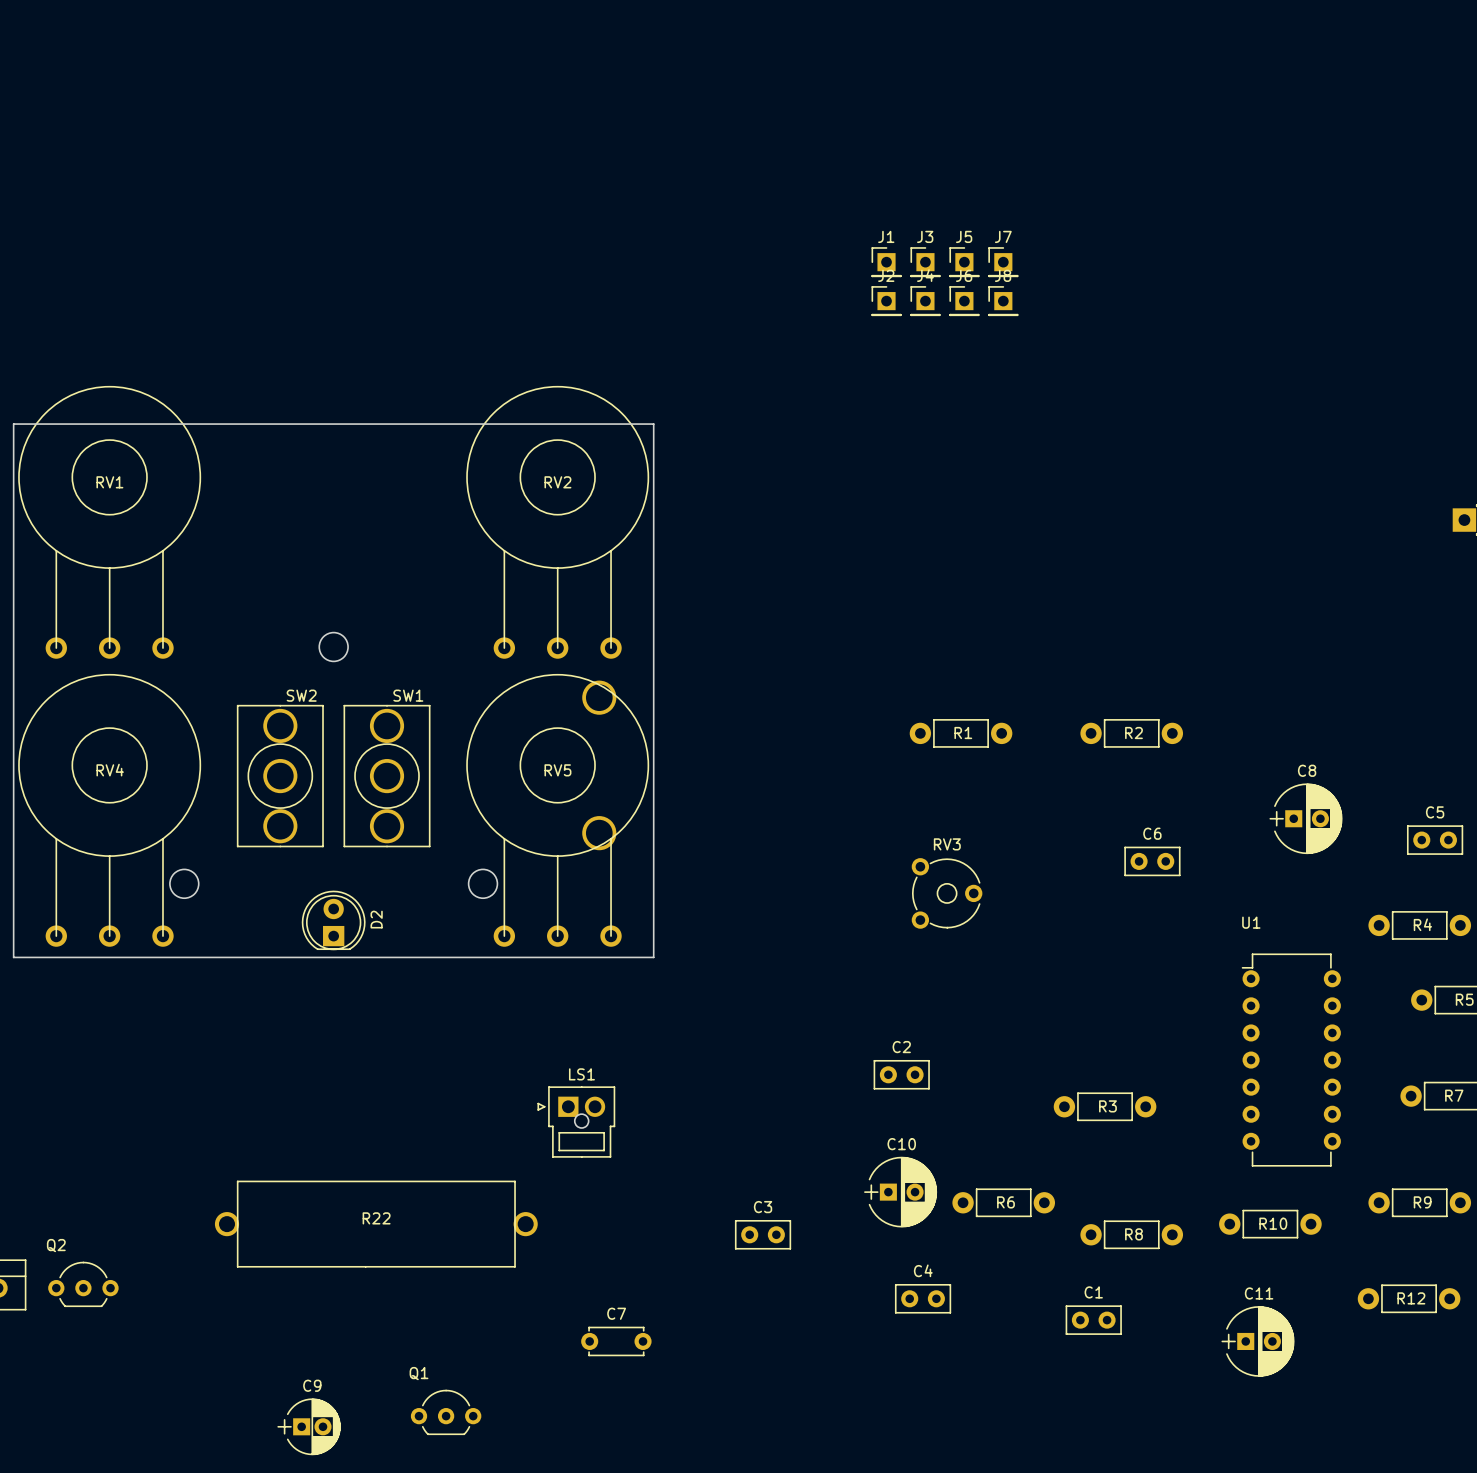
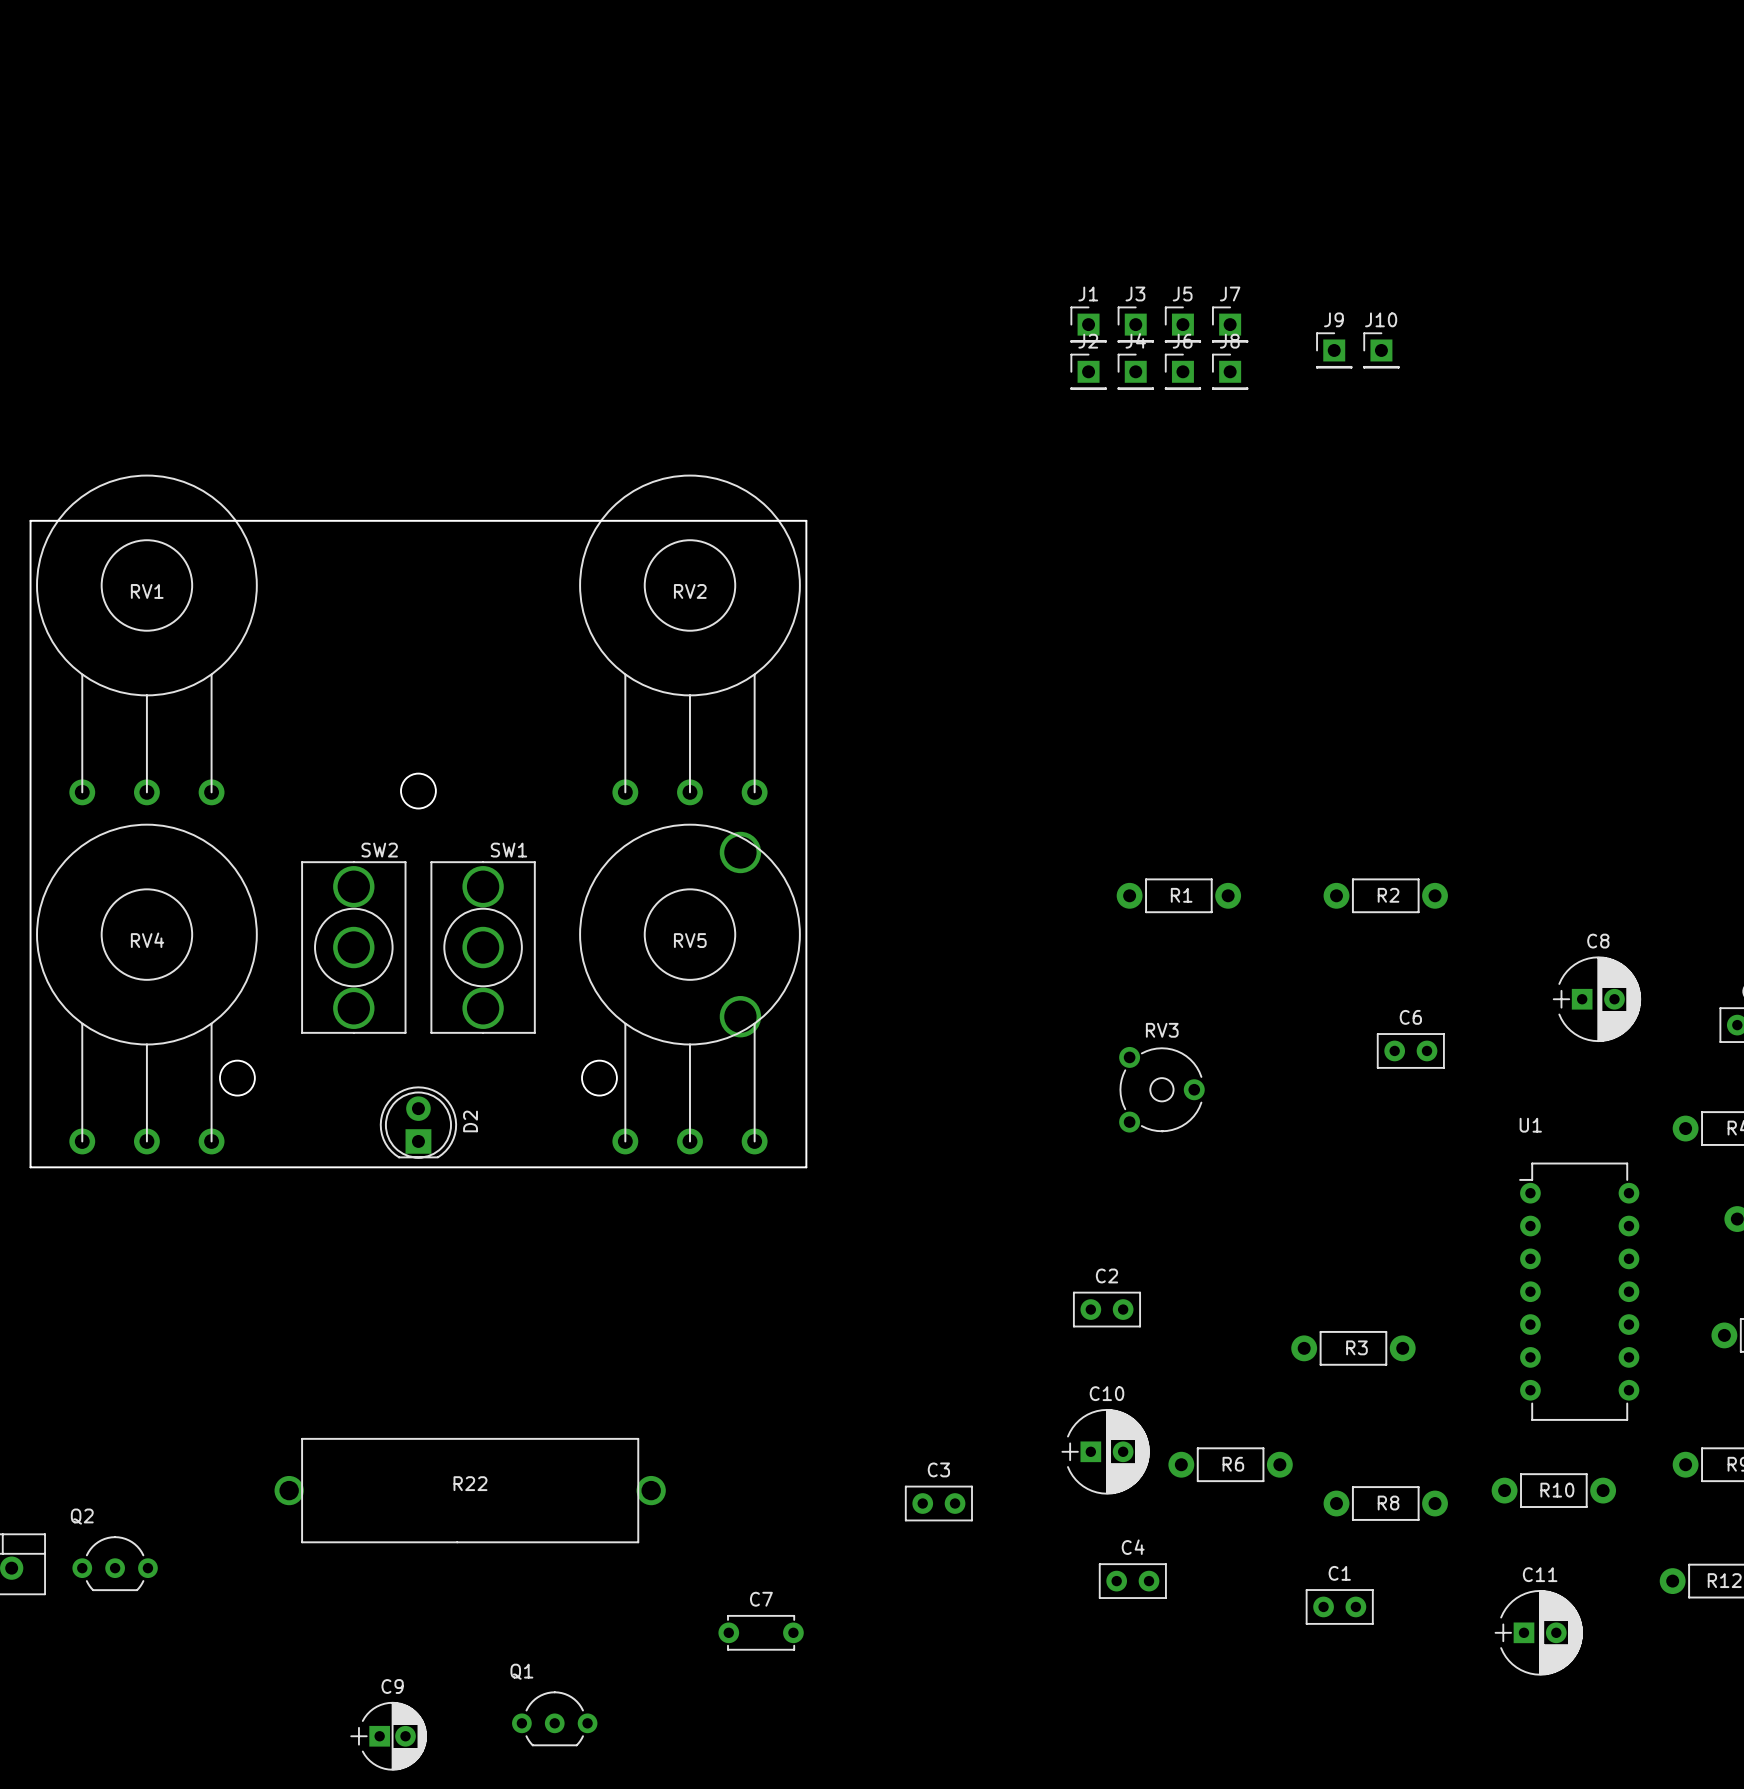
J9: none -> (1334, 350)
J10: none -> (1381, 350)
LS1: (576, 1122) -> none

